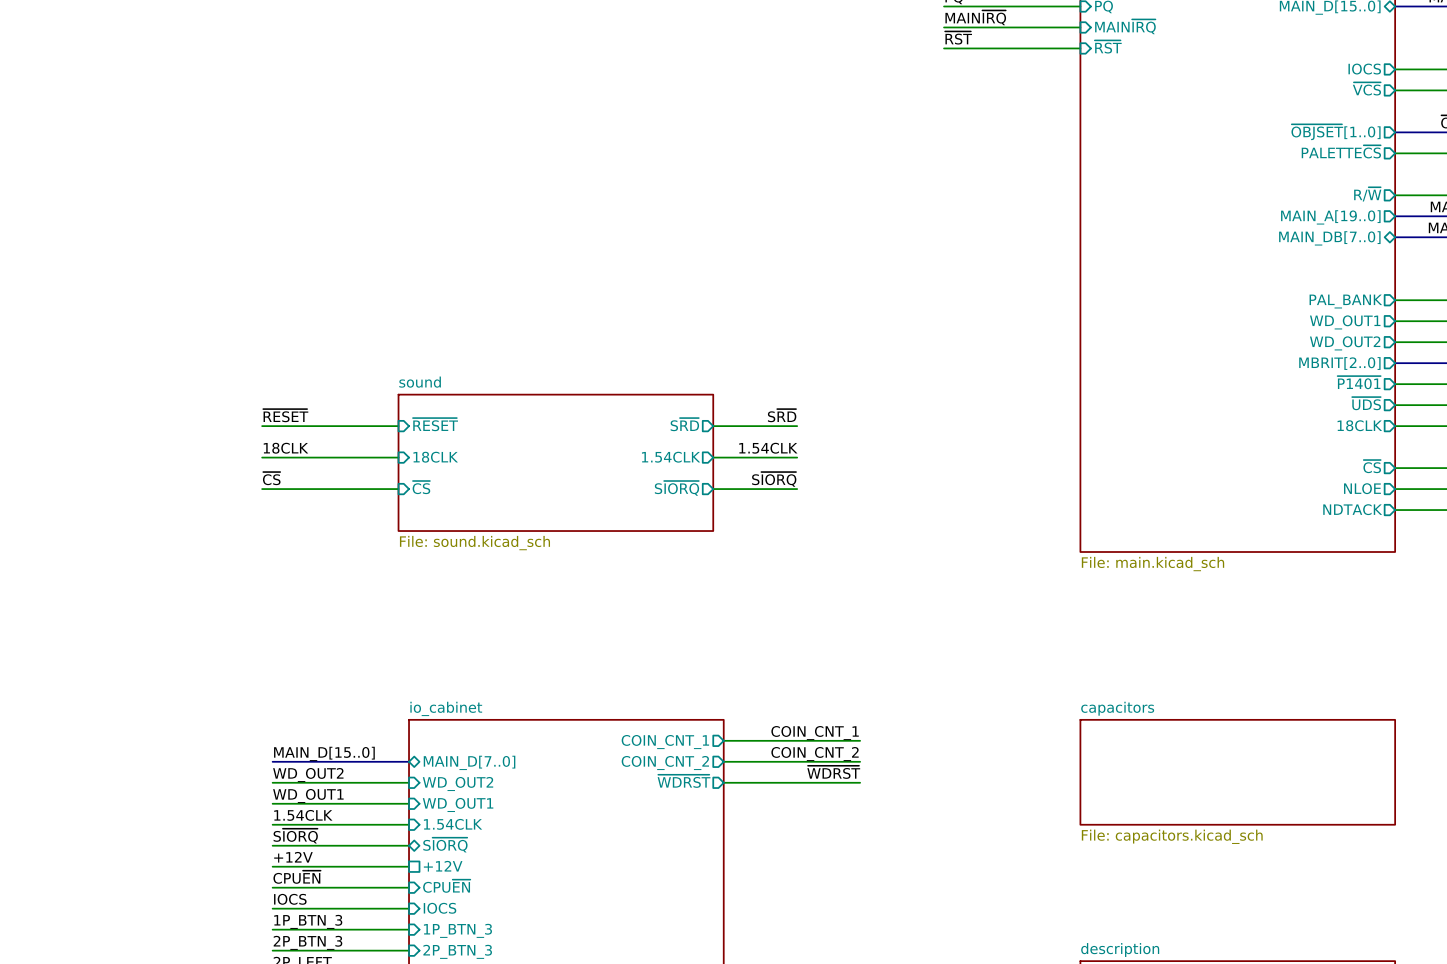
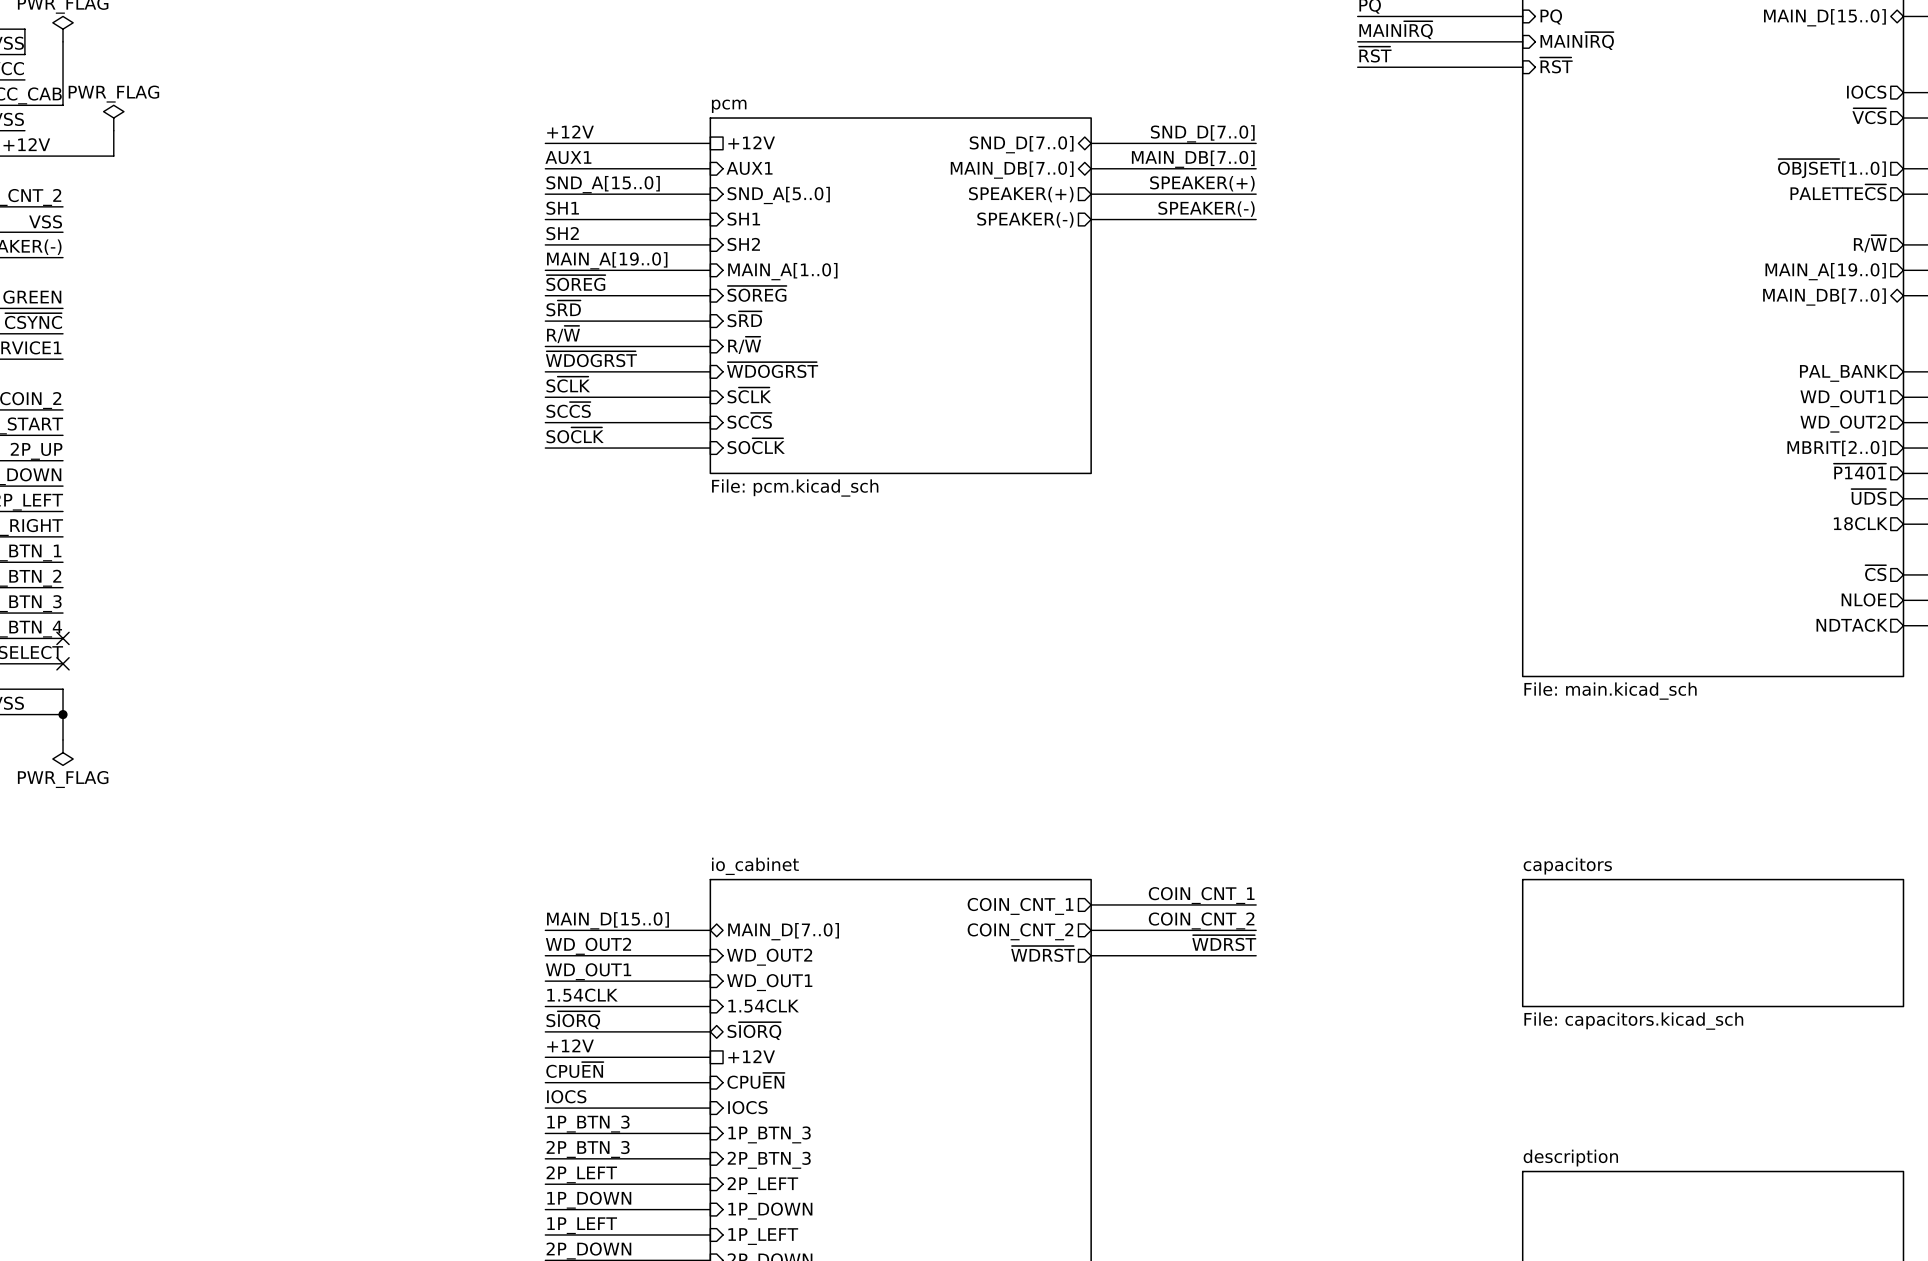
label: none -> +12V (570, 131)
label: none -> SND_D[7..0] (1202, 133)
sheet pin: none -> +12V (751, 142)
wire: none -> (545, 143) (710, 143)
bus: none -> (1091, 143) (1256, 143)
sheet pin: none -> SND_D[7..0] (1021, 144)
label: none -> AUX1 (568, 157)
label: none -> MAIN_DB[7..0] (1193, 159)
wire: none -> (545, 168) (710, 168)
sheet pin: none -> AUX1 (749, 168)
bus: none -> (1091, 168) (1256, 168)
sheet pin: none -> MAIN_DB[7..0] (1012, 170)
label: none -> SPEAKER(+) (1202, 183)
label: none -> SND_A[15..0] (603, 184)
bus: none -> (545, 194) (710, 194)
sheet pin: none -> SPEAKER(+) (1021, 194)
wire: none -> (1091, 194) (1256, 194)
sheet pin: none -> SND_A[5..0] (778, 195)
label: none -> SH1 (562, 208)
label: none -> SPEAKER(-) (1206, 209)
sheet pin: none -> SH1 (743, 219)
wire: none -> (545, 219) (710, 219)
sheet pin: none -> SPEAKER(-) (1025, 219)
wire: none -> (1091, 219) (1256, 219)
label: none -> SH2 (562, 233)
sheet pin: none -> SH2 (743, 244)
wire: none -> (545, 244) (710, 244)
label: none -> MAIN_A[19..0] (607, 260)
bus: none -> (545, 270) (710, 270)
sheet pin: none -> MAIN_A[1..0] (782, 271)
label: none -> ~{SOREG} (575, 283)
sheet pin: none -> ~{SOREG} (757, 293)
wire: none -> (545, 295) (710, 295)
sheet pcm: none -> File: pcm.kicad_sch (900, 295)
label: none -> S~{RD} (563, 308)
sheet pin: none -> S~{RD} (744, 319)
wire: none -> (545, 321) (710, 321)
label: none -> R/~{W} (563, 334)
sheet pin: none -> R/~{W} (744, 345)
wire: none -> (545, 346) (710, 346)
label: none -> ~{WDOGRST} (591, 359)
sheet pin: none -> ~{WDOGRST} (772, 370)
label: none -> S~{CLK} (568, 384)
sheet pin: none -> S~{CLK} (749, 395)
wire: none -> (545, 397) (710, 397)
label: none -> SC~{CS} (568, 409)
sheet pin: none -> SC~{CS} (749, 420)
label: none -> SO~{CLK} (575, 435)
sheet pin: none -> SO~{CLK} (756, 446)
label: ~{RESET} (285, 415) -> none
label: S~{RD} (782, 415) -> none
sheet pin: ~{RESET} (435, 424) -> none
sheet pin: S~{RD} (684, 424) -> none
wire: (262, 426) (398, 426) -> (545, 371) (710, 371)
wire: (713, 426) (797, 426) -> none
label: 18CLK (285, 448) -> none
label: 1.54CLK (768, 448) -> none
wire: (262, 457) (398, 457) -> (545, 422) (710, 422)
sheet pin: 18CLK (435, 457) -> none
sheet pin: 1.54CLK (671, 457) -> none
wire: (713, 457) (797, 457) -> none
sheet sound: File: sound.kicad_sch (555, 462) -> none
label: ~{CS} (271, 478) -> none
label: S~{IORQ} (774, 479) -> none
sheet pin: ~{CS} (421, 487) -> none
sheet pin: S~{IORQ} (676, 488) -> none
wire: (262, 489) (398, 489) -> (545, 448) (710, 448)
wire: (713, 489) (797, 489) -> none

